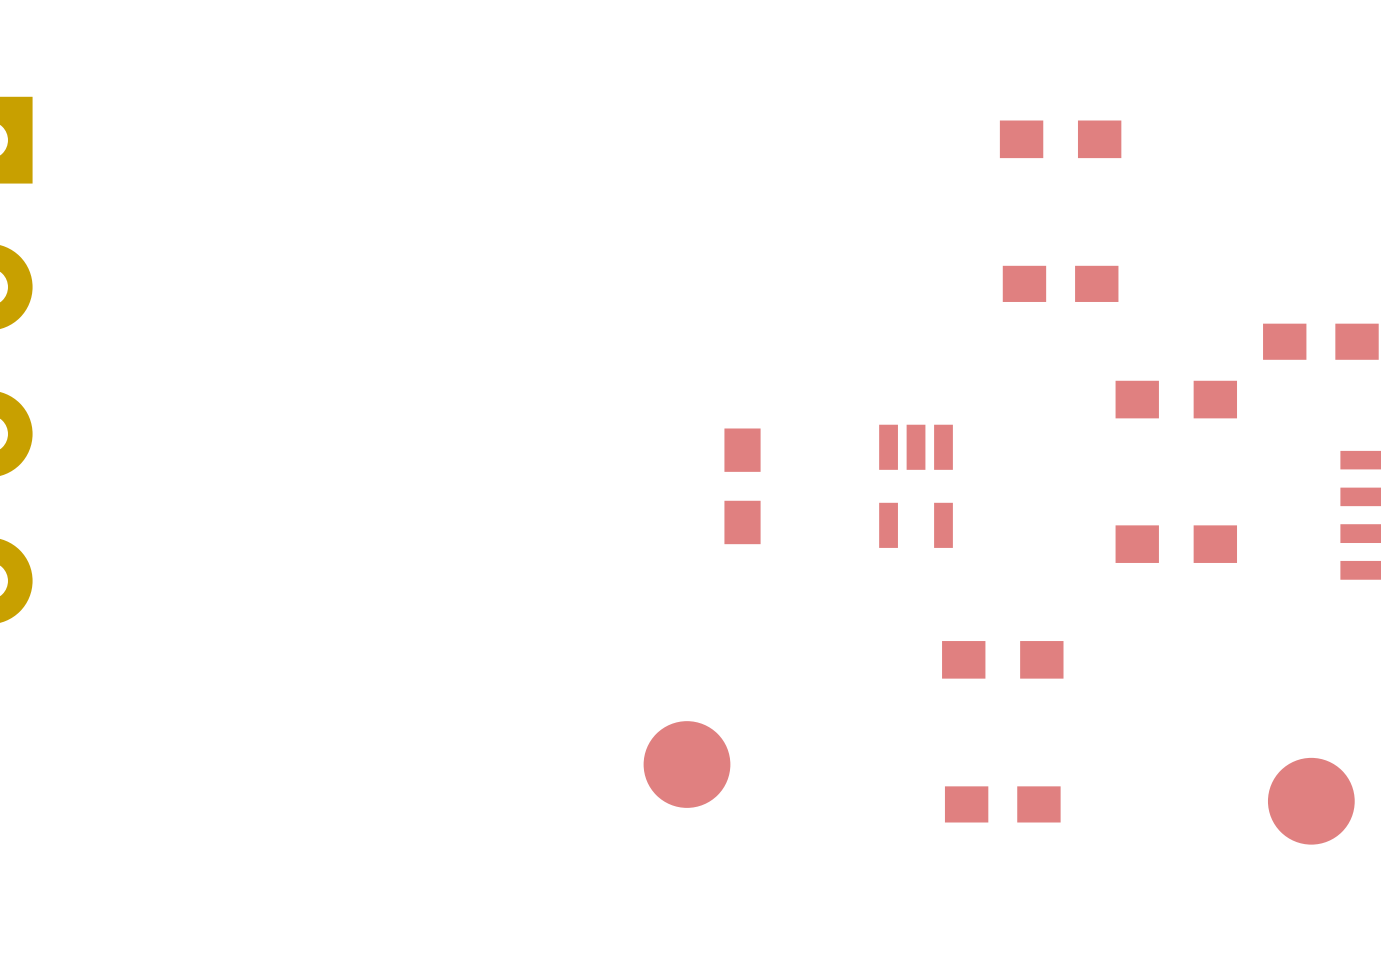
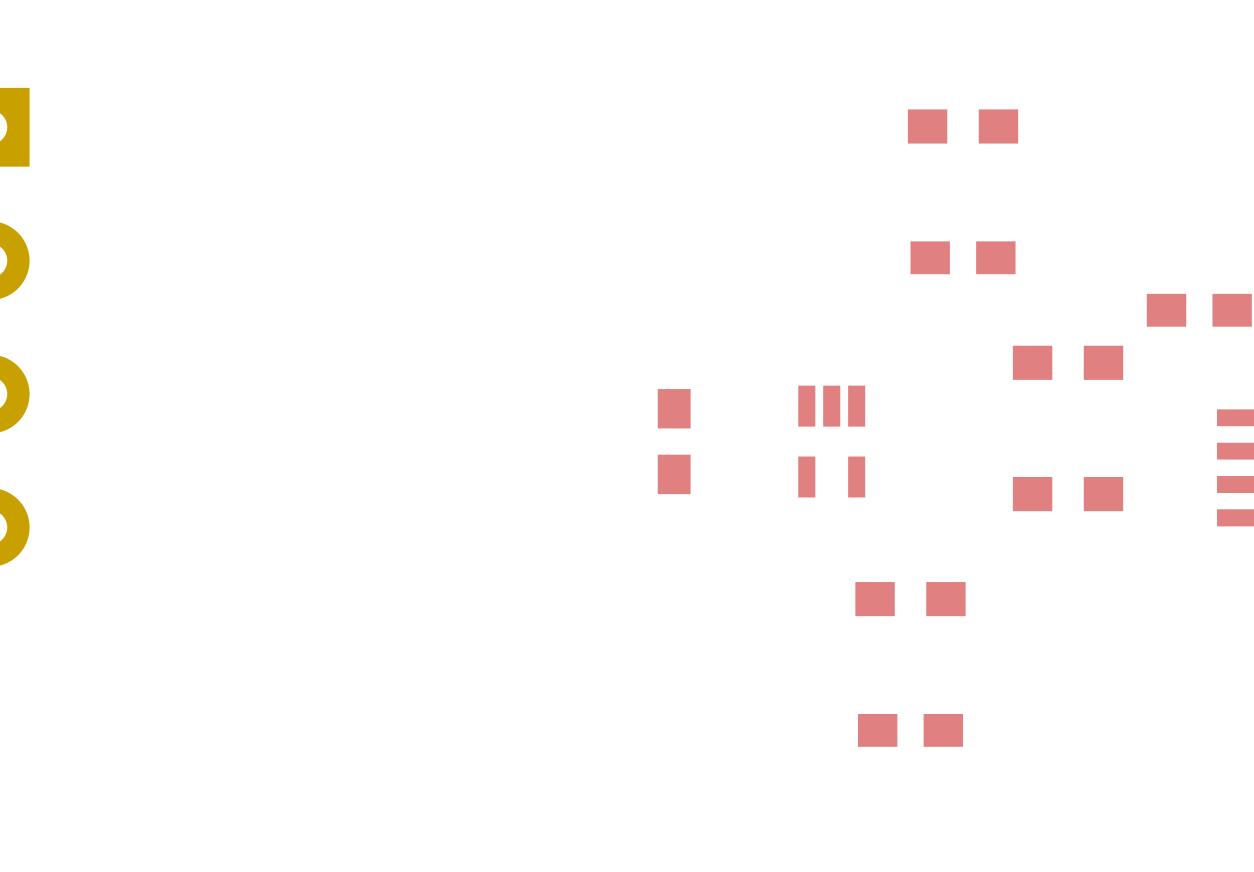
part: (686, 764) -> none
part: (1311, 801) -> none

